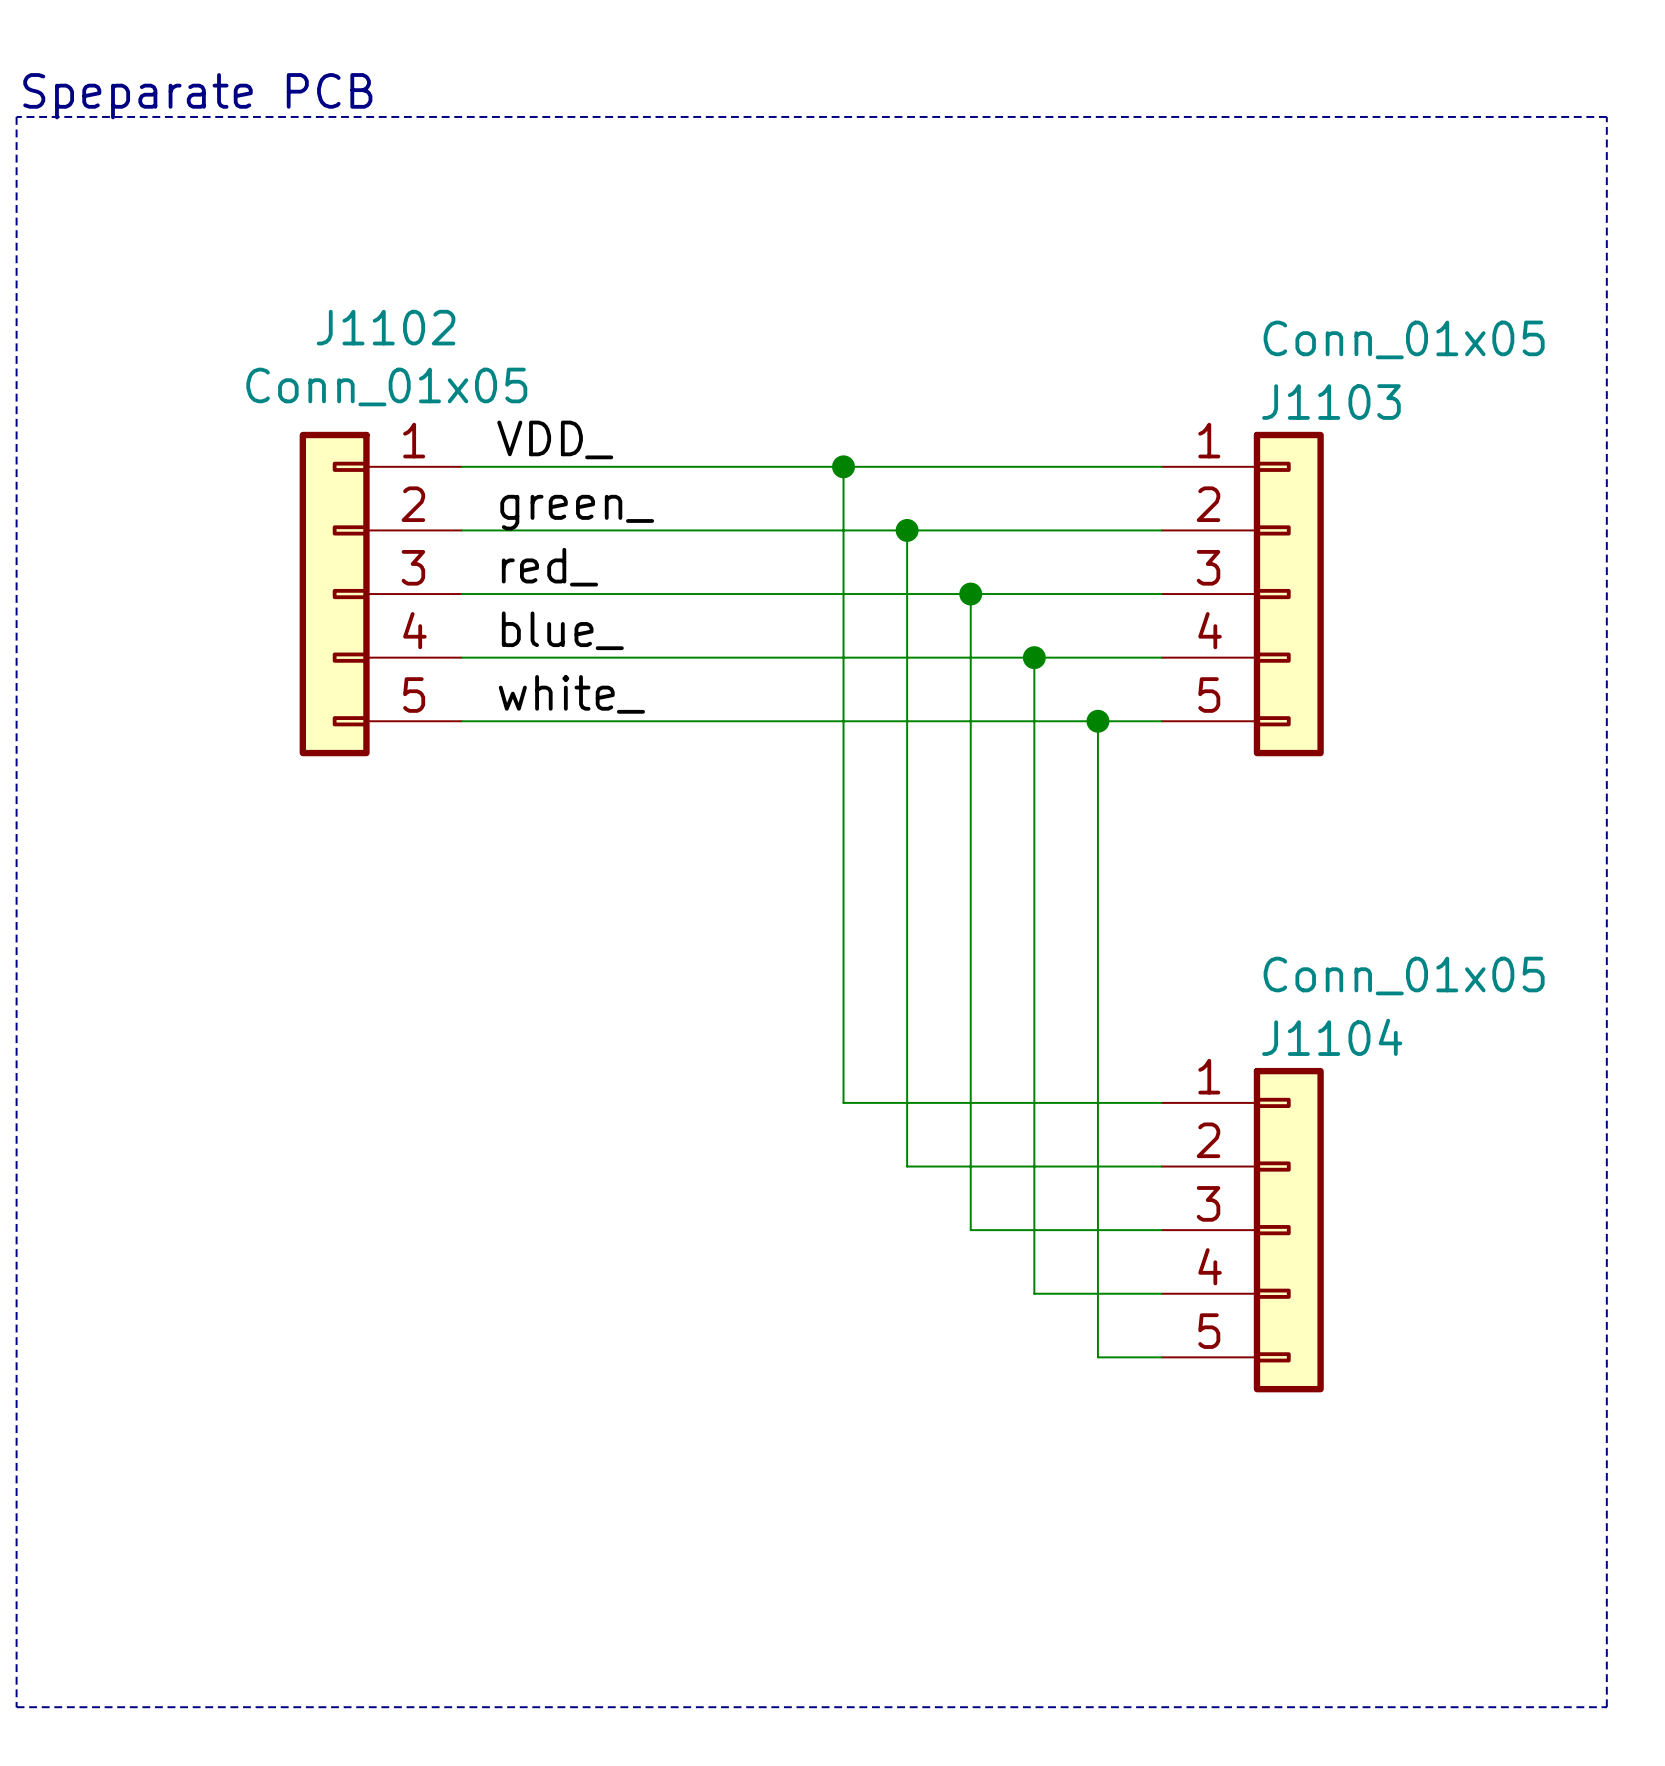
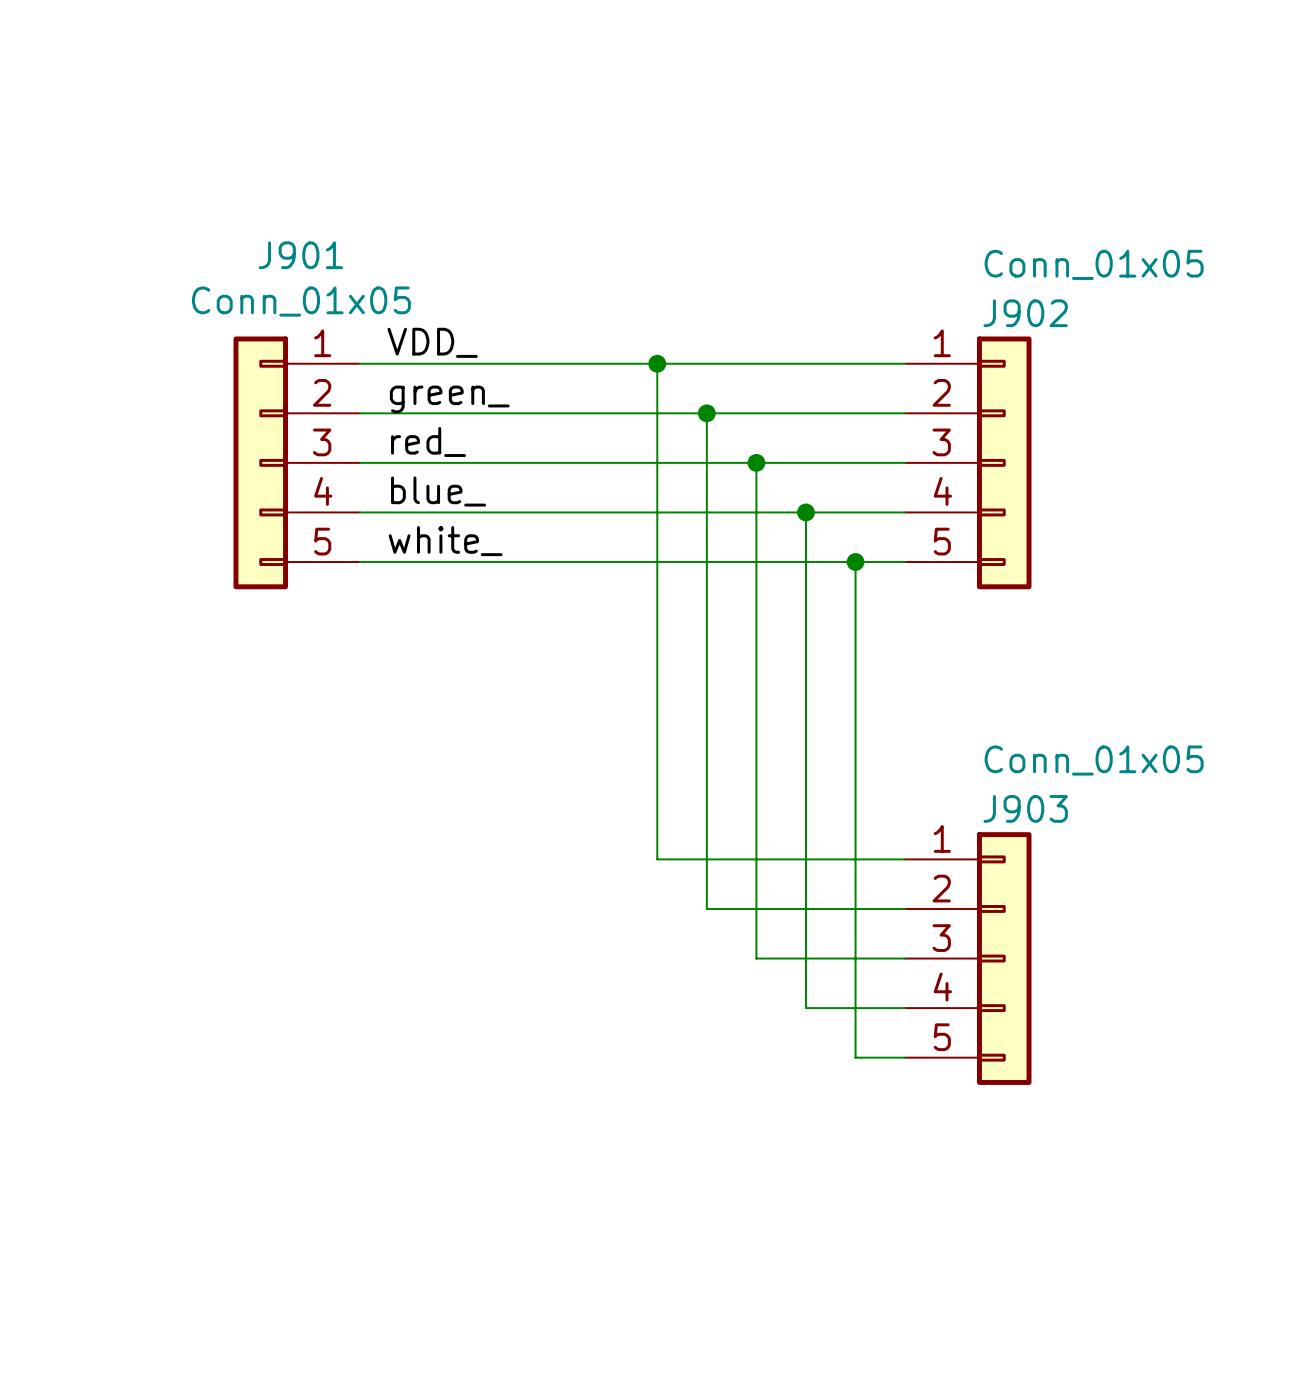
text: Speparate PCB (197, 96) -> none
line: (16, 116) (16, 1707) (1606, 1707) (1606, 116) (16, 116) -> none
J1102 name: J1102 (386, 327) -> J901 (300, 255)
J1103 name: J1103 (1331, 402) -> J902 (1025, 313)
J1104 name: J1104 (1332, 1037) -> J903 (1025, 808)

